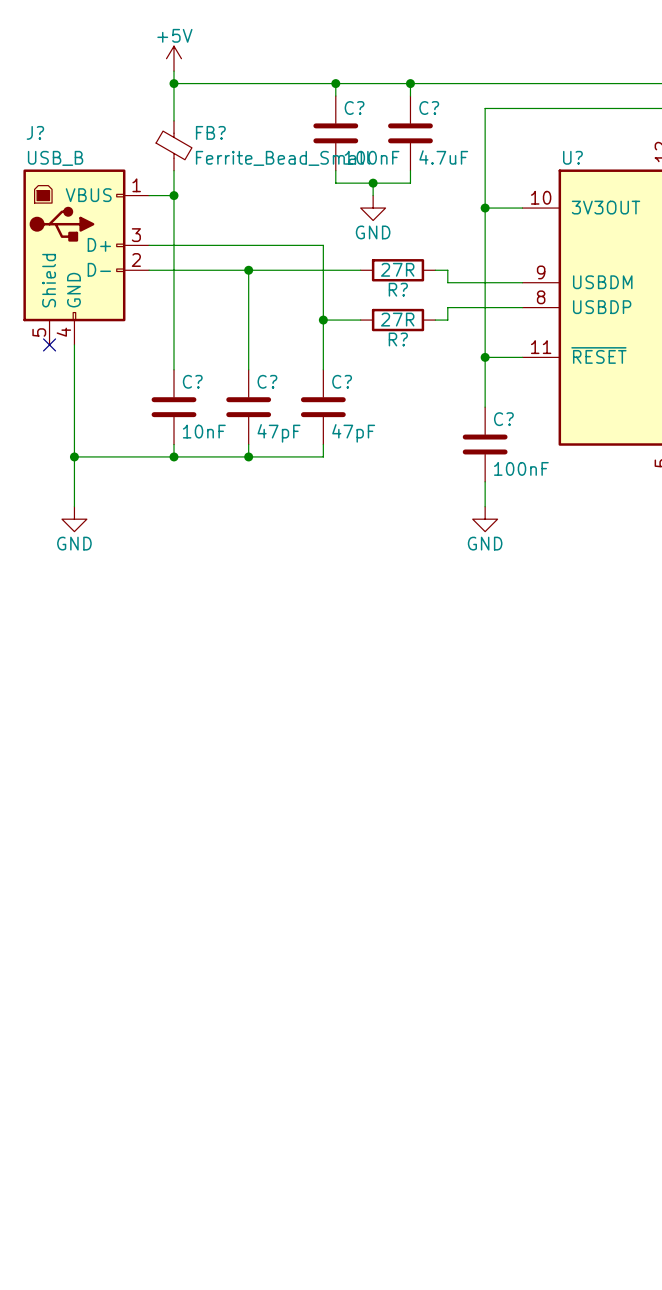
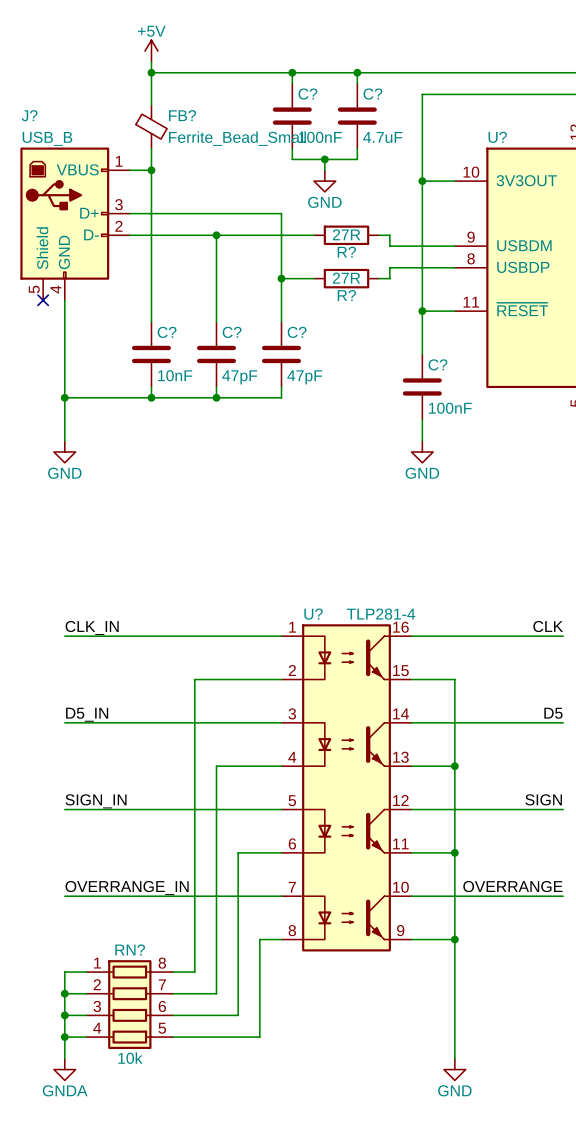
label: none -> CLK (548, 626)
label: none -> CLK_IN (92, 627)
wire: none -> (64, 636) (281, 636)
wire: none -> (411, 636) (563, 636)
wire: none -> (281, 679) (194, 679) (194, 972) (173, 972)
wire: none -> (411, 679) (454, 679) (454, 1058)
label: none -> D5_IN (87, 714)
label: none -> D5 (553, 713)
wire: none -> (64, 722) (281, 722)
wire: none -> (411, 722) (563, 722)
wire: none -> (281, 766) (216, 766) (216, 993) (173, 993)
wire: none -> (411, 766) (454, 766)
junction: none -> (454, 766)
U?: none -> TLP281-4 (346, 787)
label: none -> SIGN (543, 799)
label: none -> SIGN_IN (96, 801)
wire: none -> (64, 809) (281, 809)
wire: none -> (411, 809) (563, 809)
wire: none -> (281, 852) (238, 852) (238, 1015) (173, 1015)
wire: none -> (411, 852) (454, 852)
junction: none -> (454, 852)
label: none -> OVERRANGE_IN (127, 888)
label: none -> OVERRANGE (512, 886)
wire: none -> (64, 896) (281, 896)
wire: none -> (411, 896) (563, 896)
wire: none -> (281, 939) (259, 939) (259, 1037) (173, 1037)
wire: none -> (411, 939) (454, 939)
junction: none -> (454, 939)
wire: none -> (86, 972) (64, 972) (64, 1058)
wire: none -> (64, 993) (86, 993)
junction: none -> (64, 993)
RN?: none -> 10k (129, 1004)
wire: none -> (64, 1015) (86, 1015)
junction: none -> (64, 1015)
wire: none -> (64, 1037) (86, 1037)
junction: none -> (64, 1037)
power symbol: none -> GNDA (64, 1069)
power symbol: none -> GND (454, 1069)

